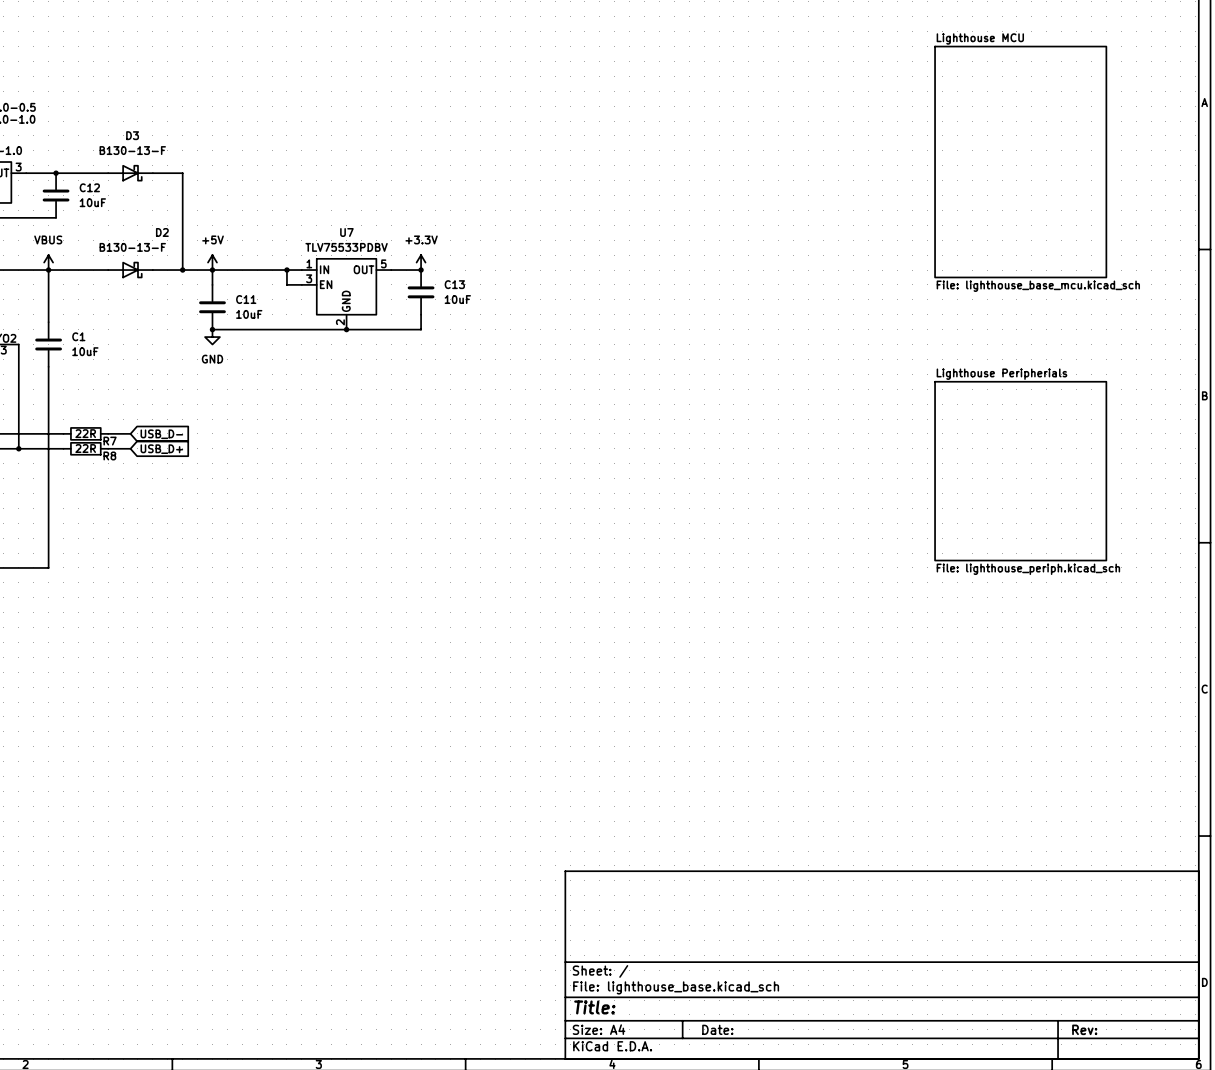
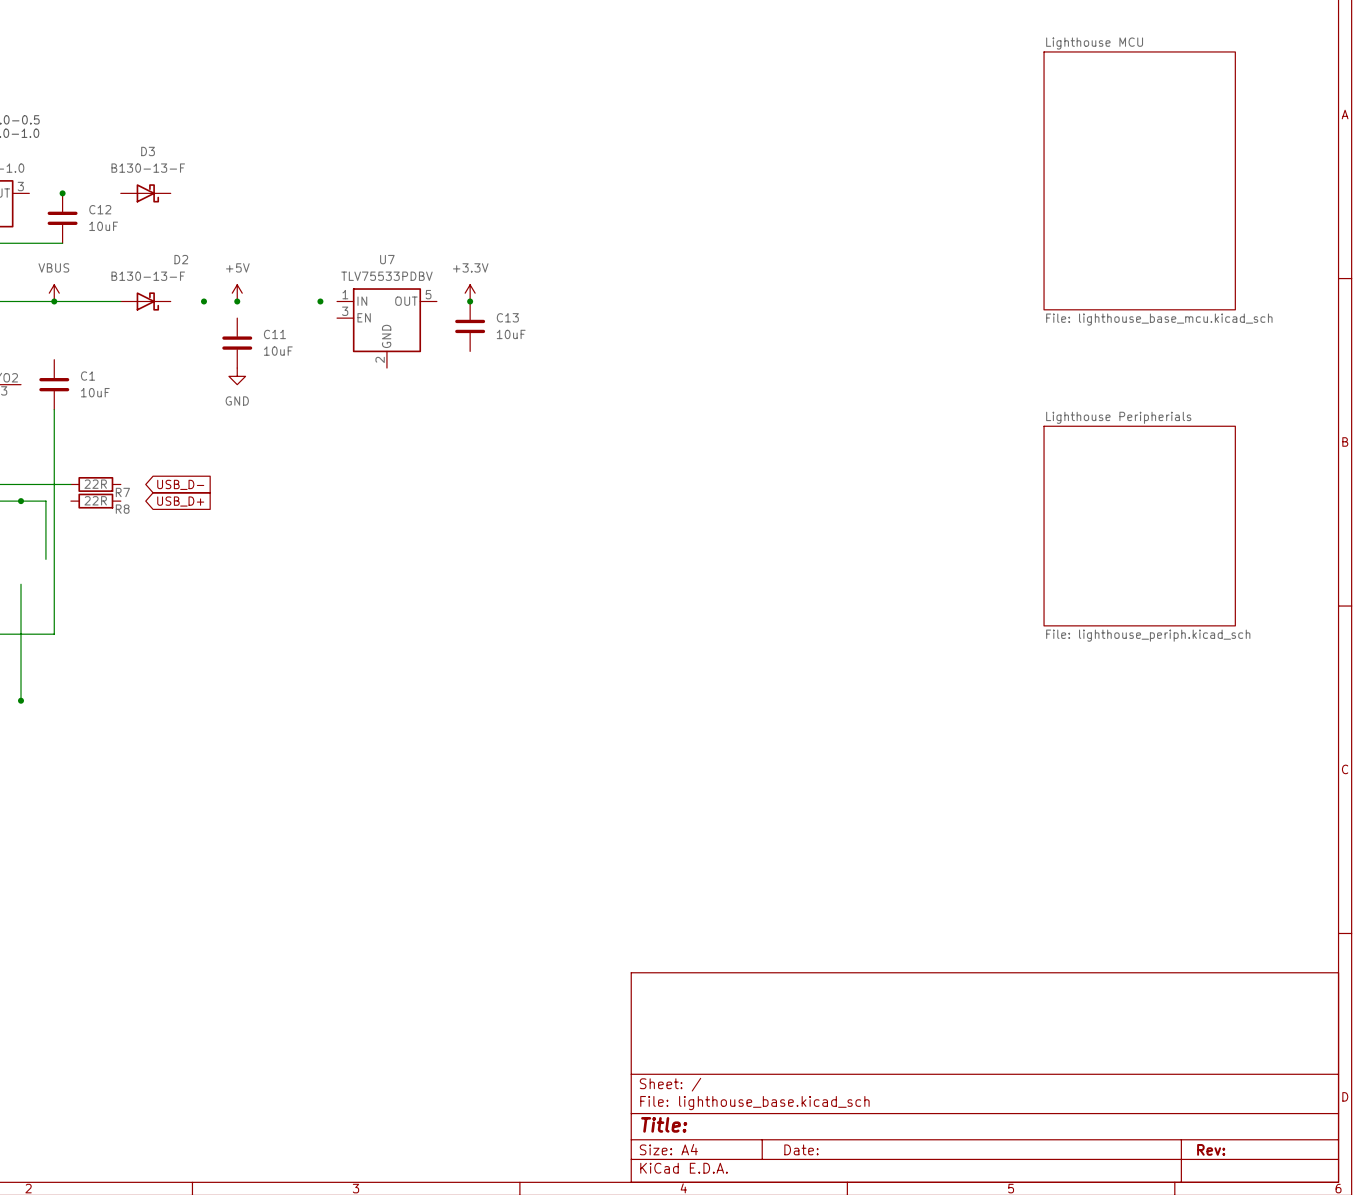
wire: (26, 173) (108, 173) -> none
wire: (152, 173) (182, 173) (182, 270) -> none
wire: (48, 270) (48, 322) -> none
wire: (152, 270) (301, 270) -> none
wire: (212, 270) (212, 284) -> none
wire: (286, 270) (286, 284) (301, 284) -> none
wire: (391, 270) (421, 270) -> none
wire: (421, 314) (421, 329) (212, 329) -> none
junction: (212, 329) -> none
junction: (346, 329) -> none
wire: (18, 344) (18, 448) -> none
wire: (108, 433) (130, 433) -> none
wire: (41, 448) (63, 448) -> (45, 501) (45, 559)
wire: (108, 448) (130, 448) -> none
wire: none -> (21, 584) (21, 700)
junction: none -> (21, 700)

